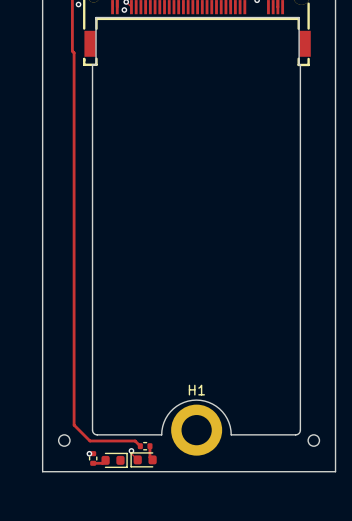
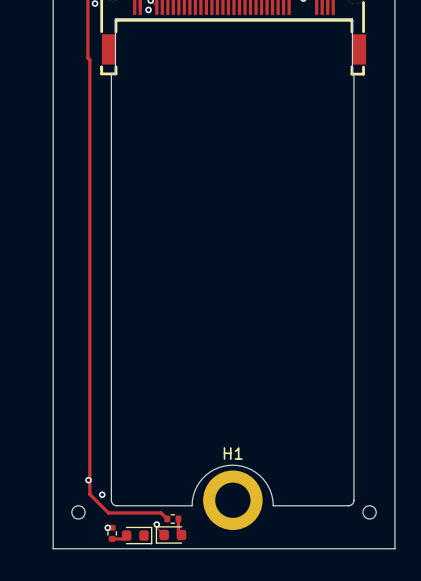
via: none -> (88, 480)
via: none -> (102, 494)

